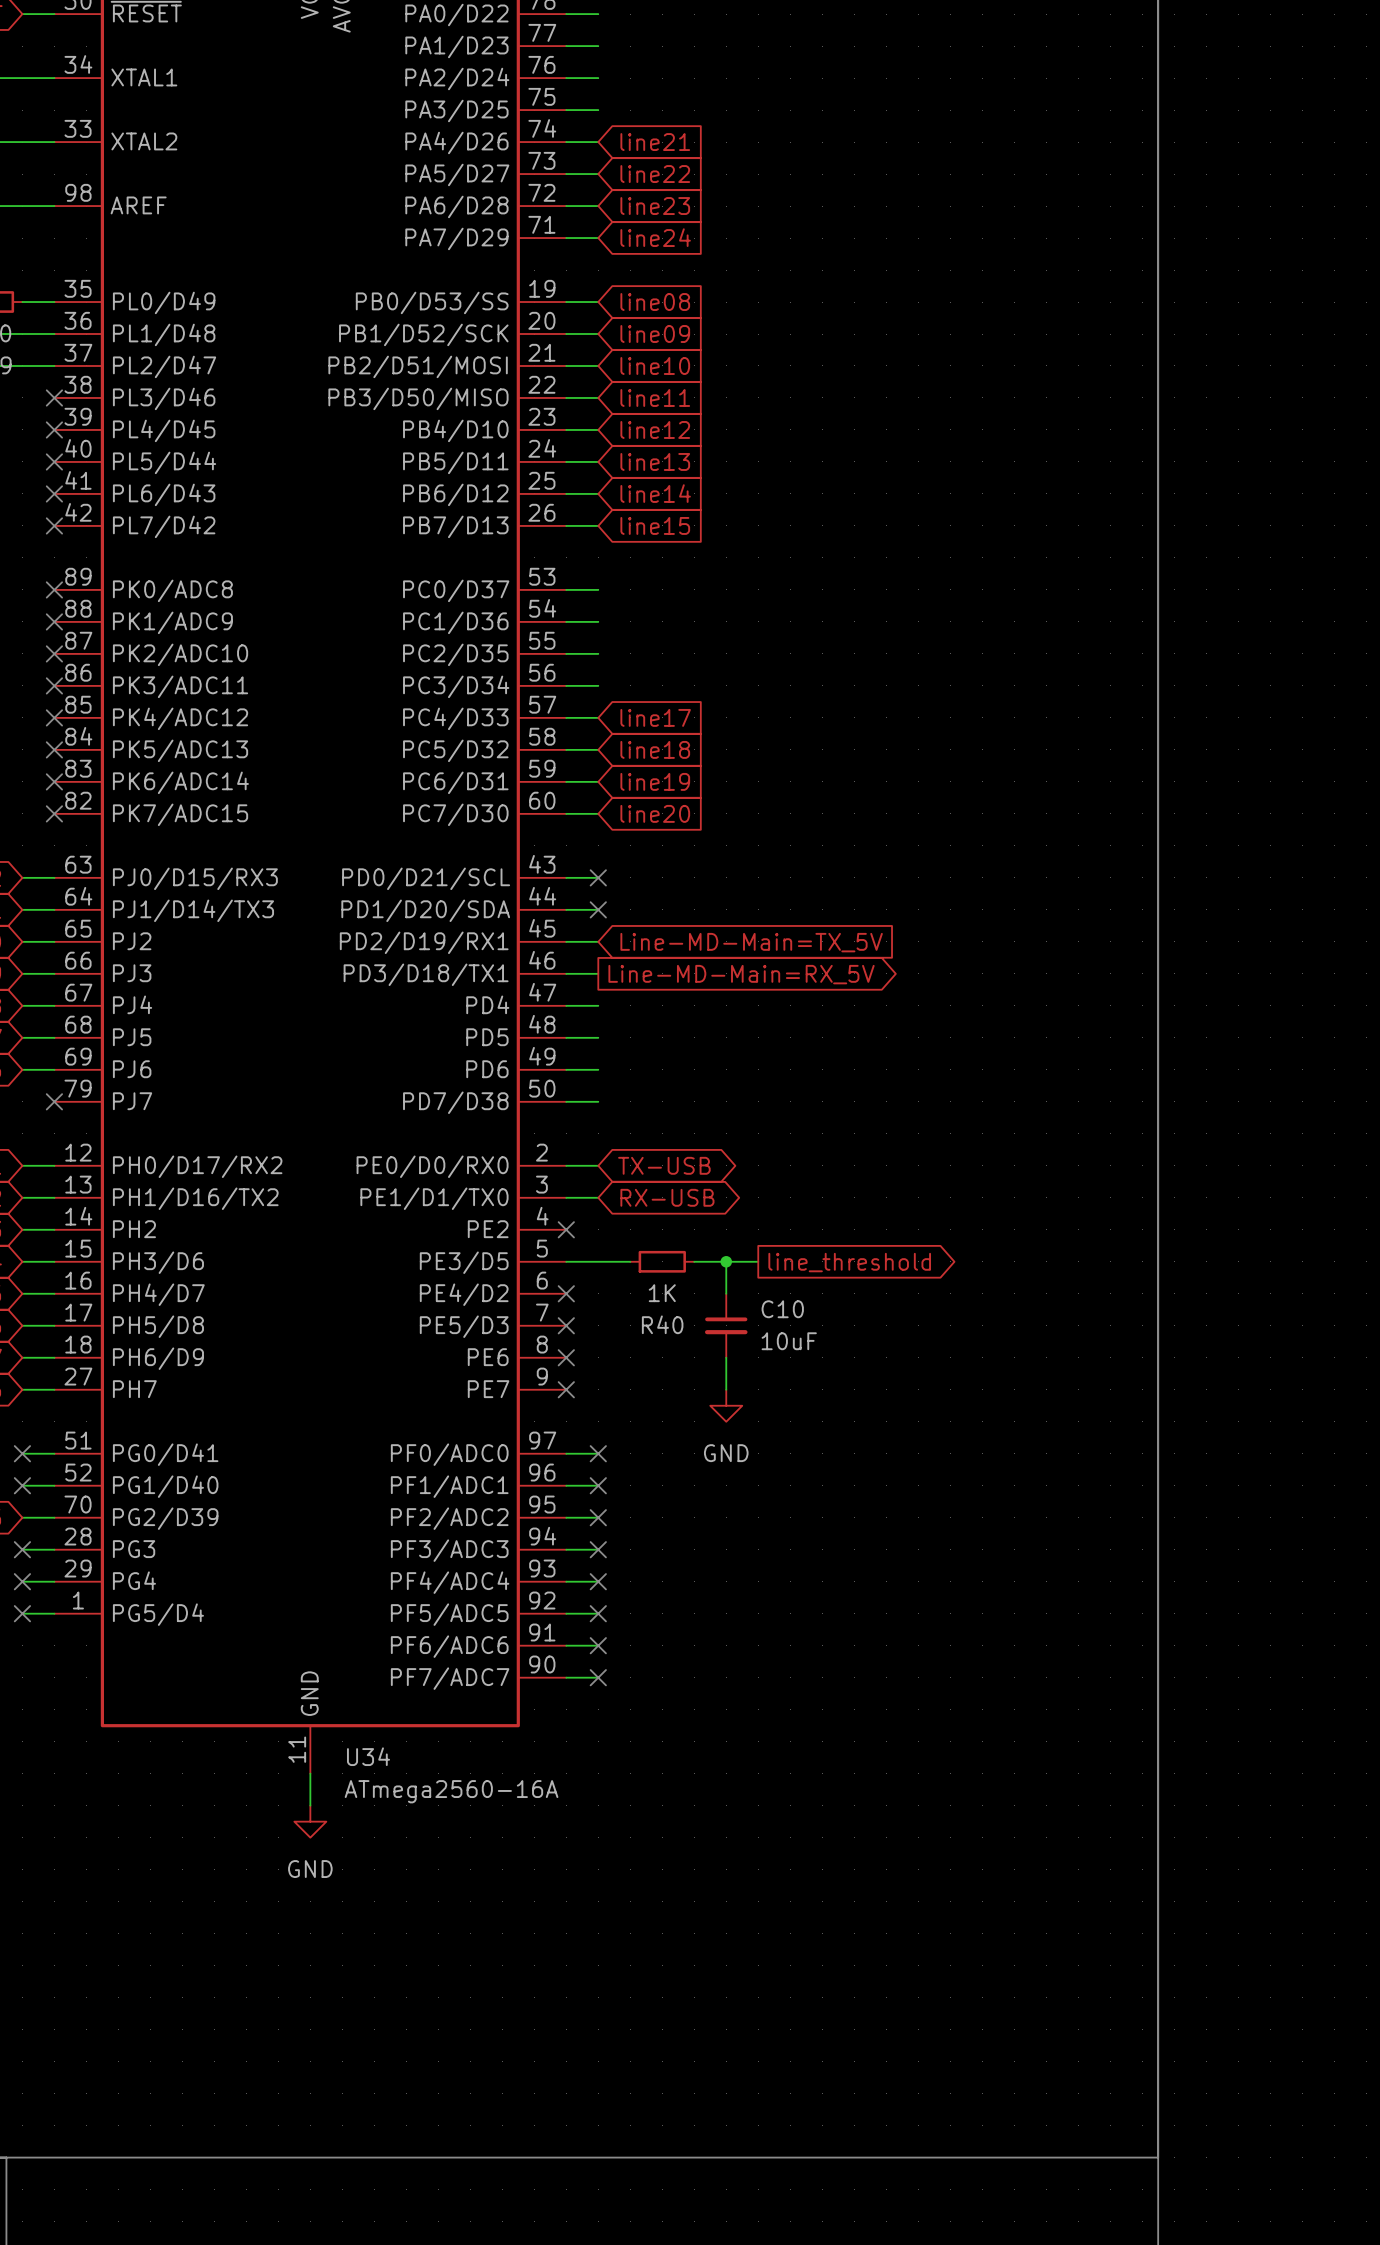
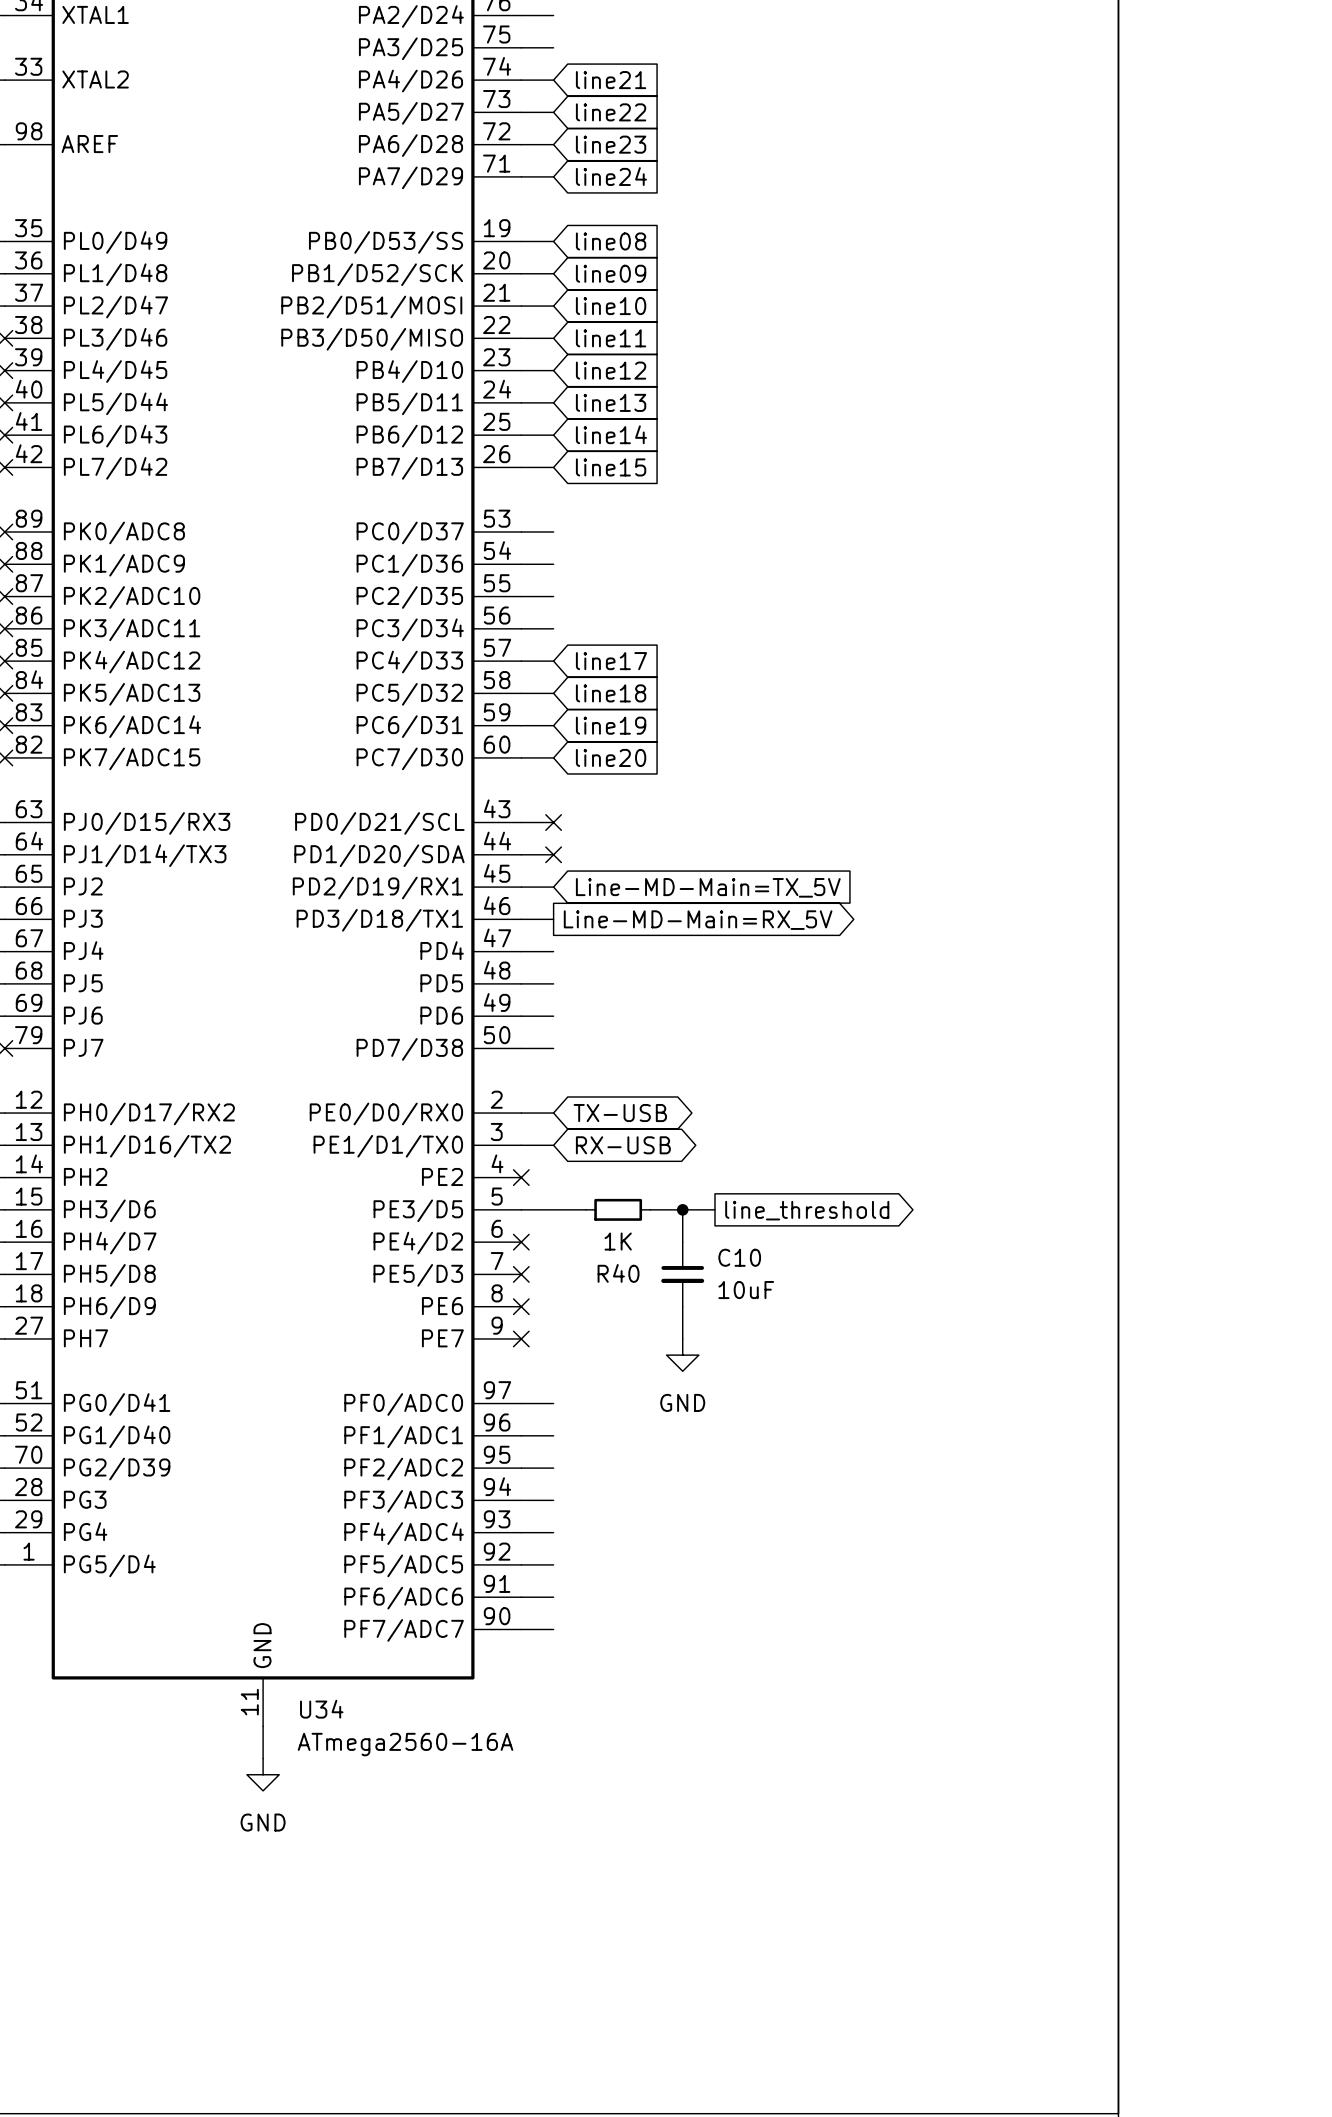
no-connect mark: (598, 1453) -> none
no-connect mark: (598, 1485) -> none
no-connect mark: (598, 1517) -> none
no-connect mark: (598, 1549) -> none
no-connect mark: (598, 1581) -> none
no-connect mark: (598, 1613) -> none
no-connect mark: (598, 1645) -> none
no-connect mark: (598, 1677) -> none

